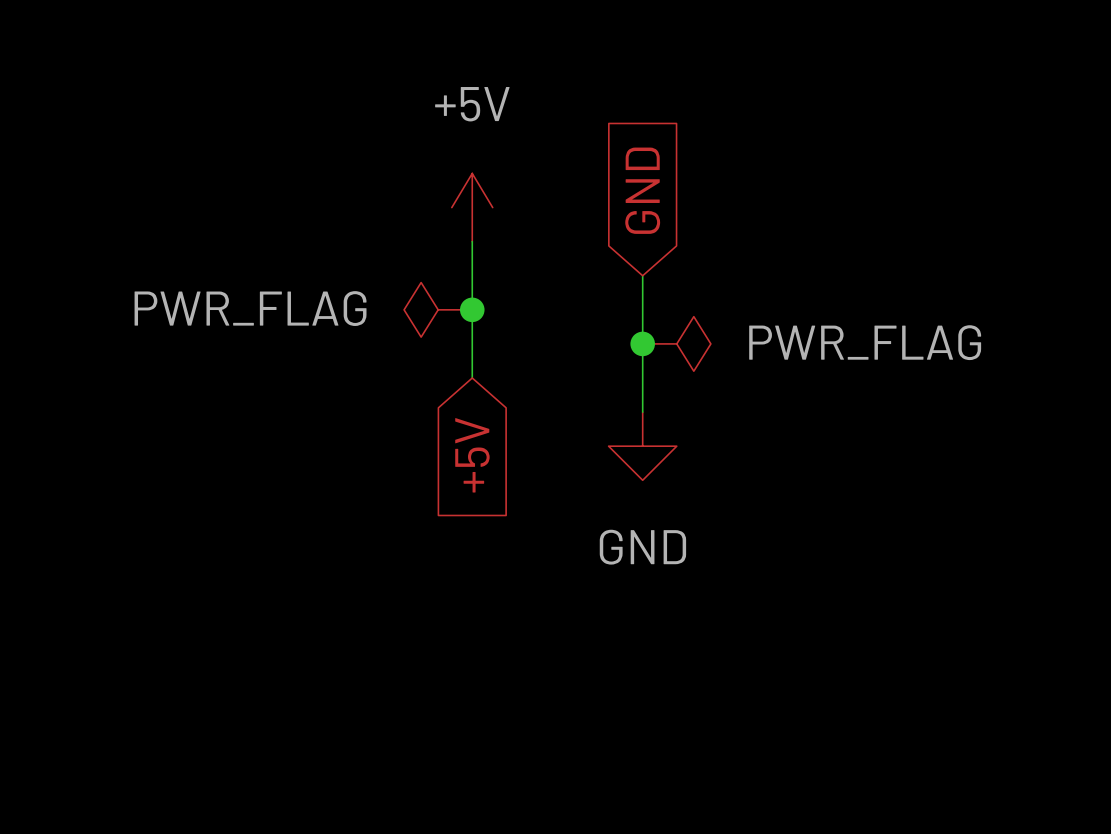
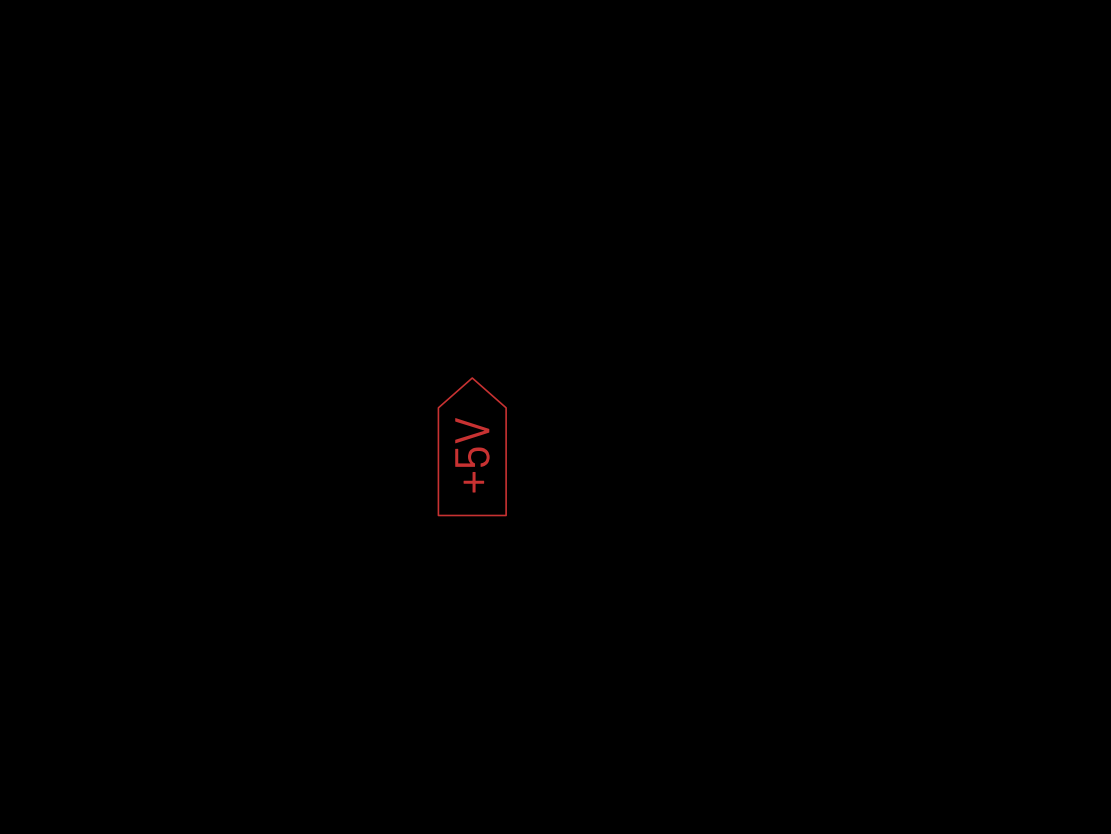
global label: GND (642, 190) -> none
power symbol: +5V (472, 207) -> none
wire: (472, 241) (472, 378) -> none
wire: (642, 275) (642, 412) -> none
power symbol: PWR_FLAG (438, 309) -> none
junction: (472, 309) -> none
junction: (642, 343) -> none
power symbol: PWR_FLAG (676, 343) -> none
power symbol: GND (642, 446) -> none

